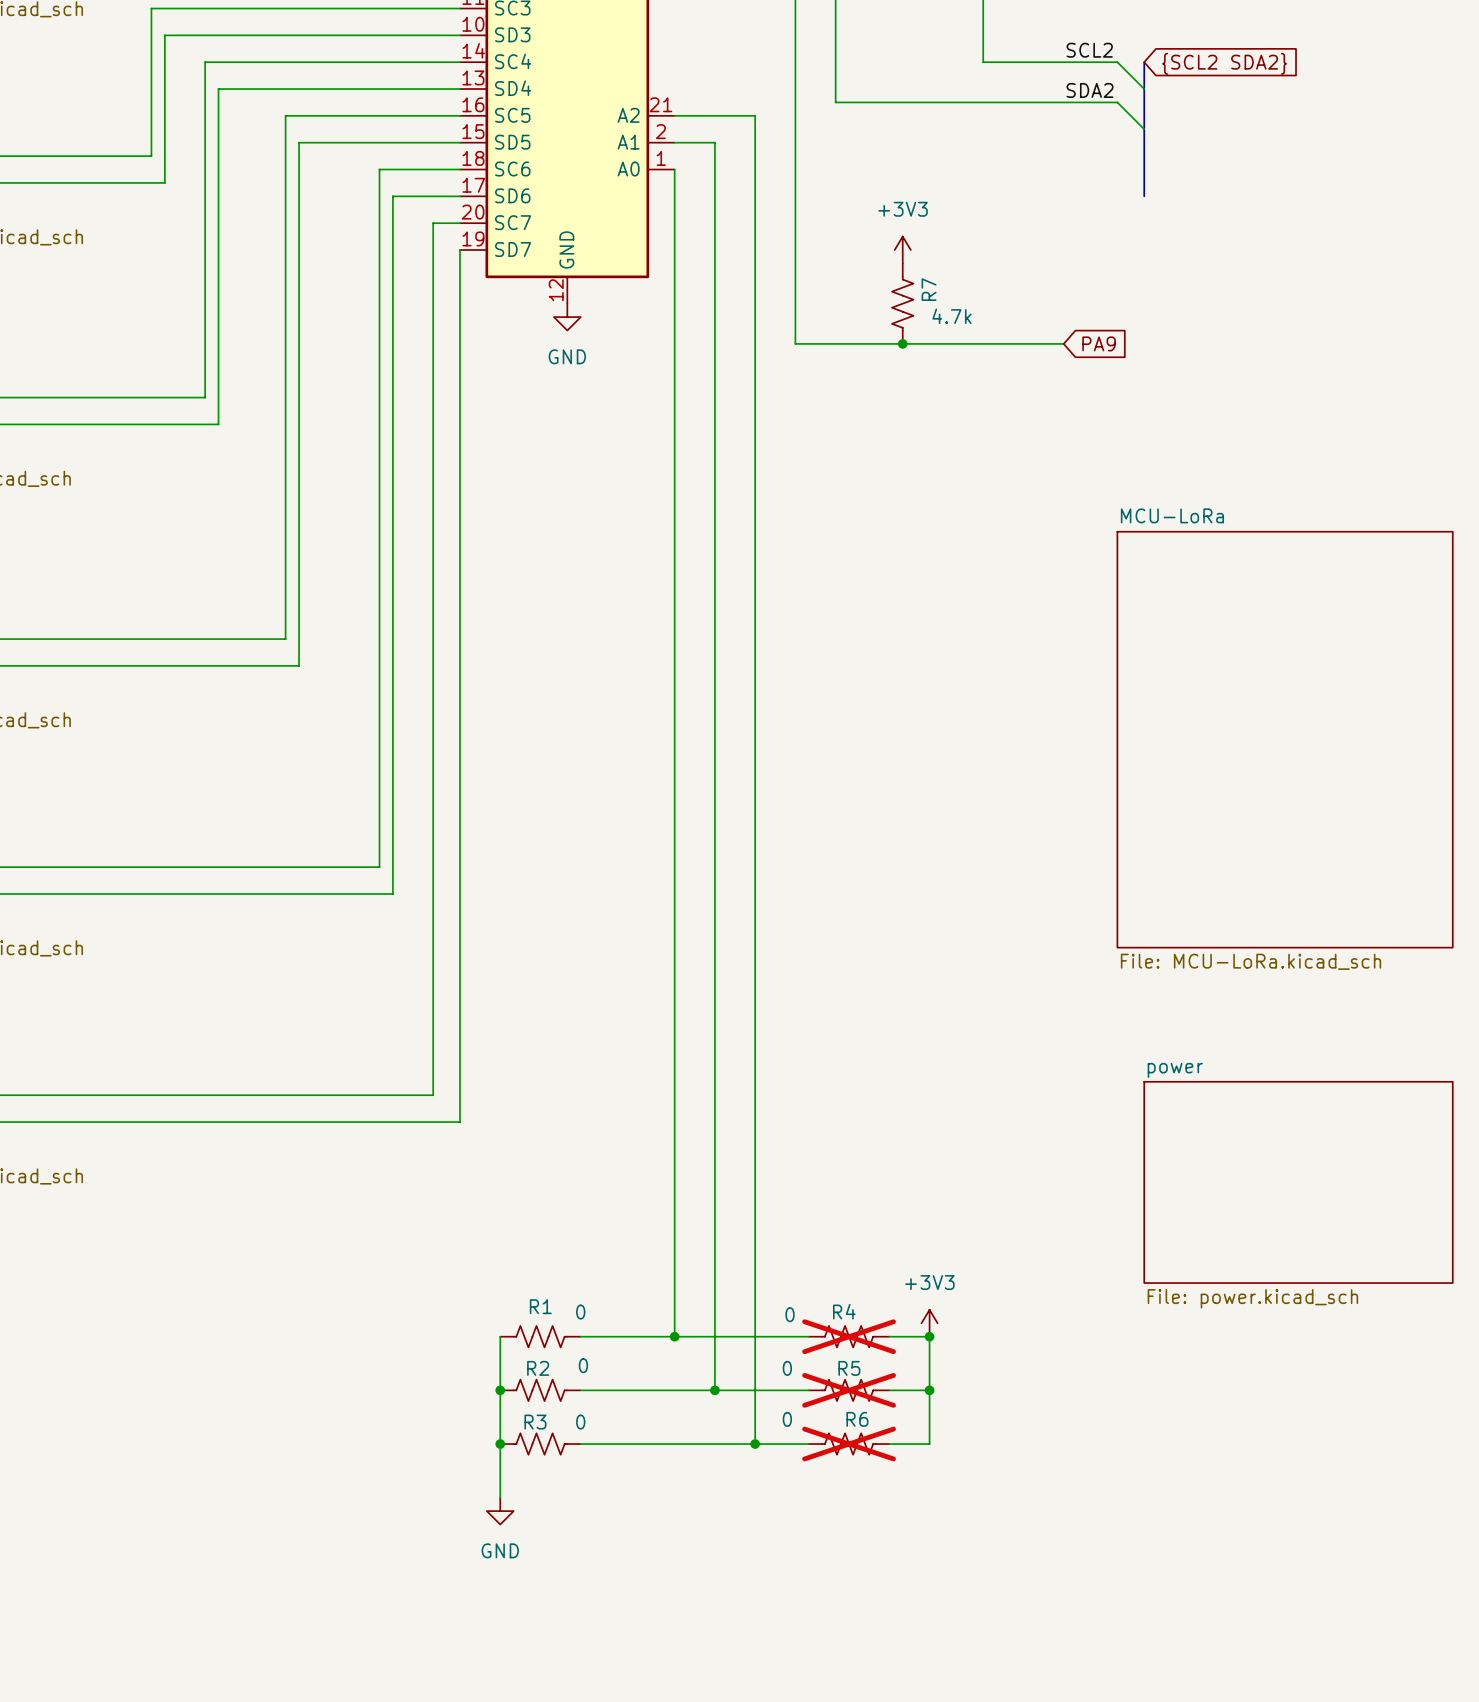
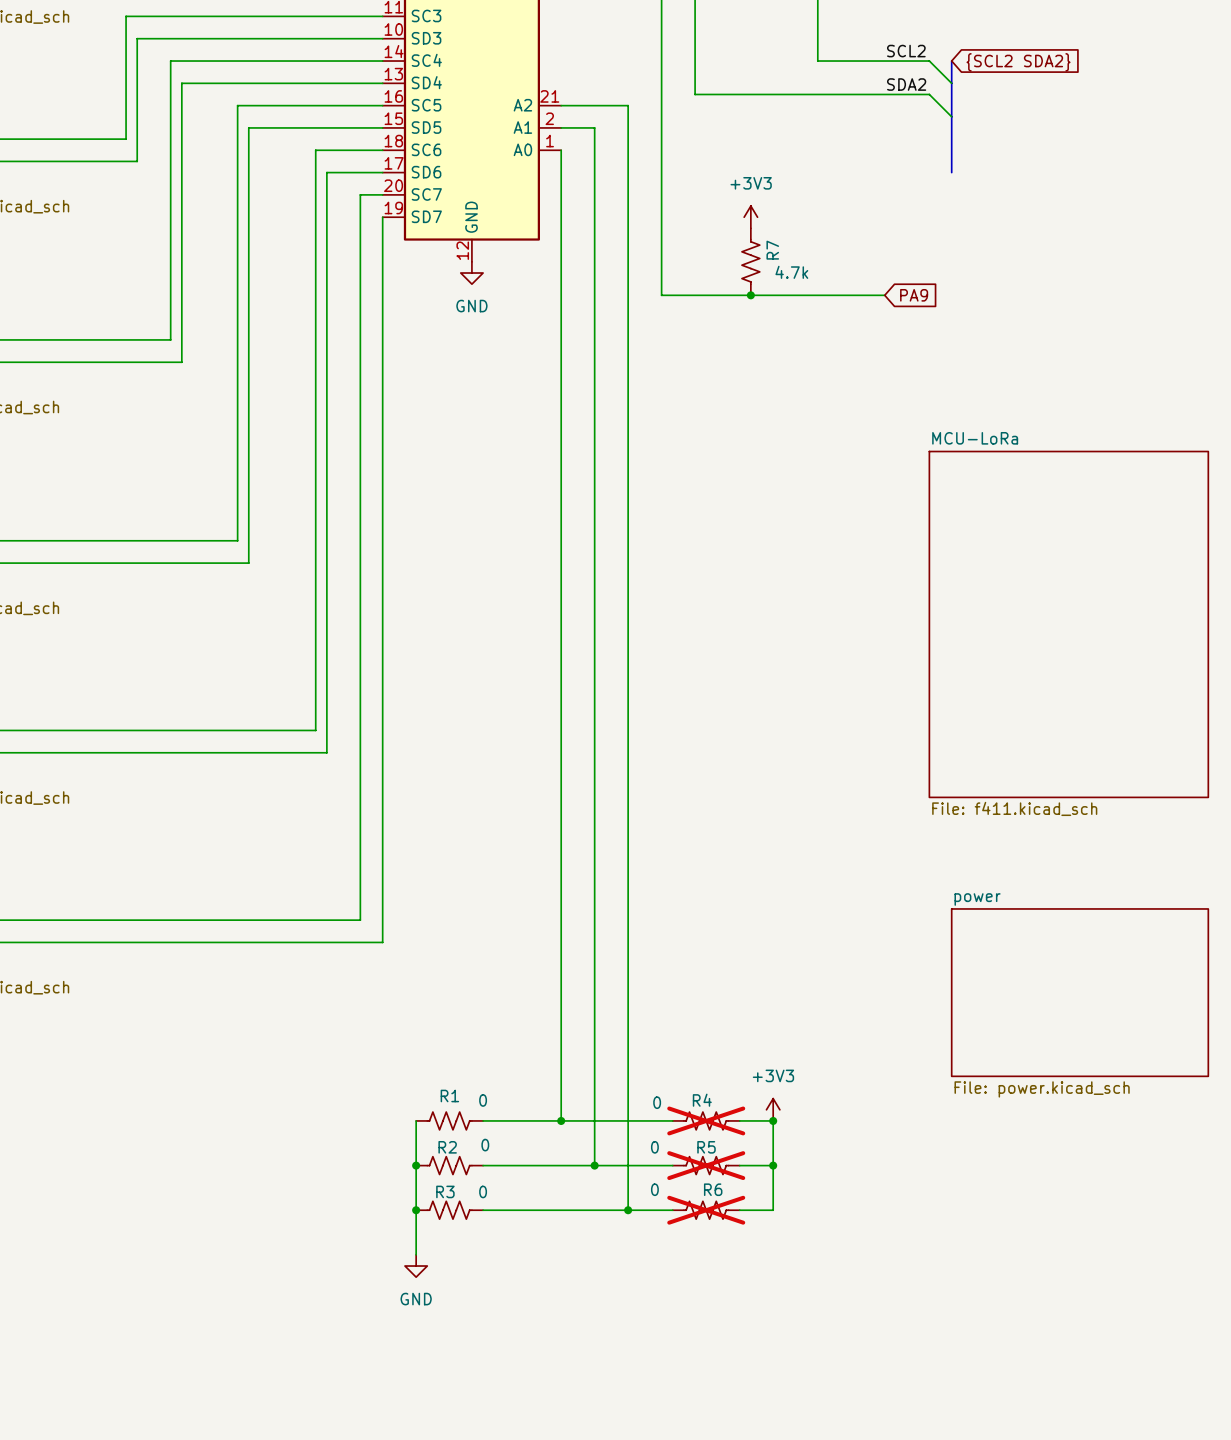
sheet MCU-LoRa value: File: MCU-LoRa.kicad_sch (1251, 961) -> File: f411.kicad_sch (1014, 808)

